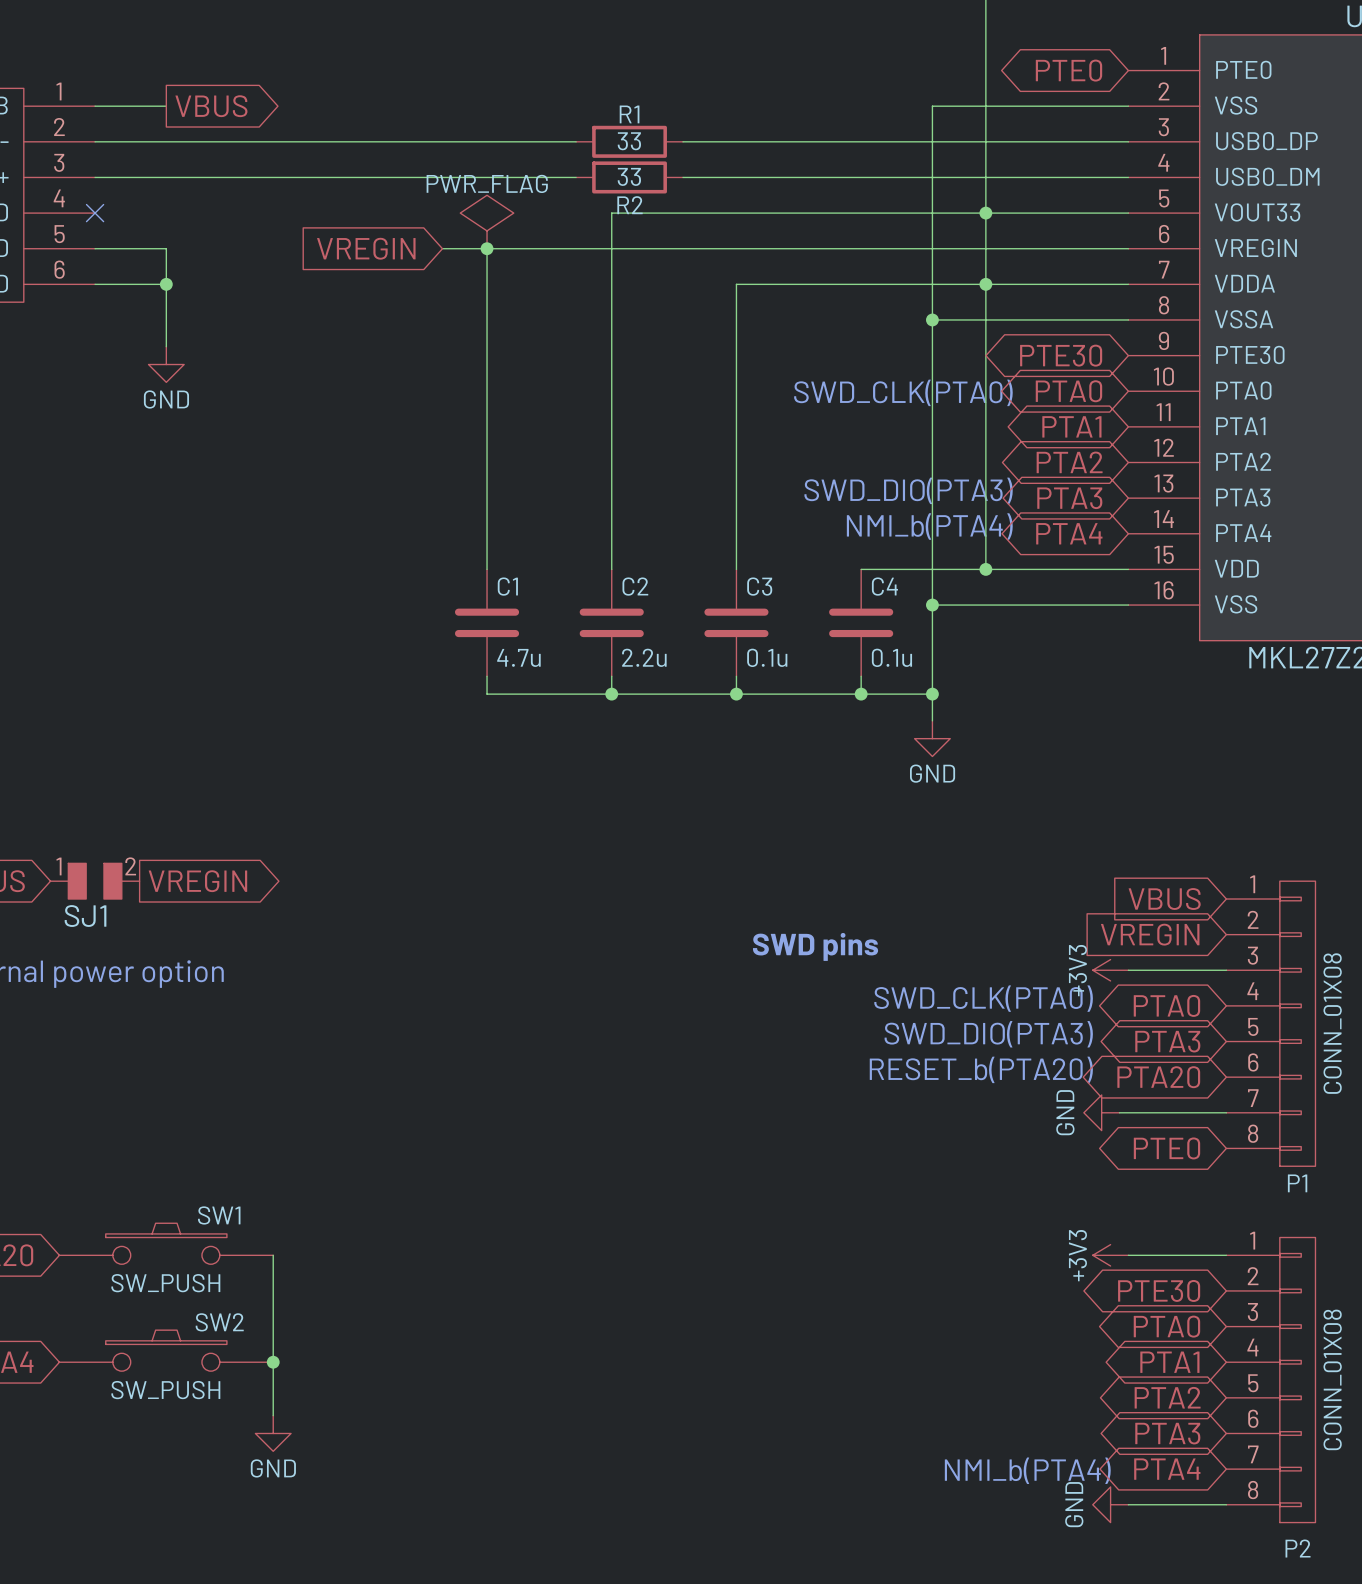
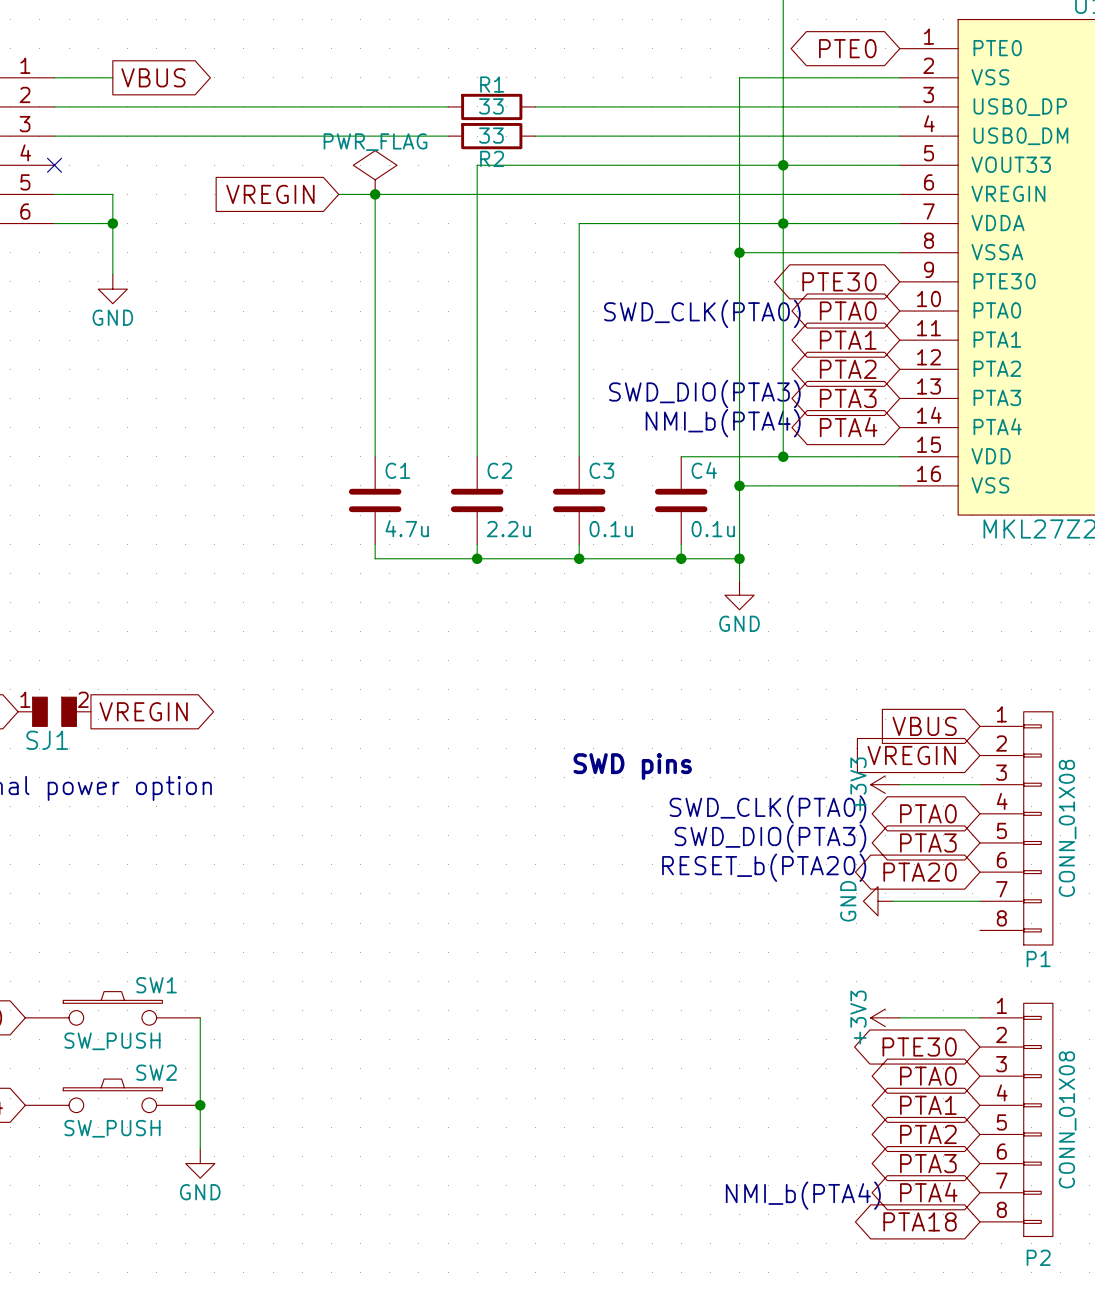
global label: PTE0 (1166, 1148) -> none
power symbol: GND (1110, 1504) -> none
wire: (1128, 1504) (1226, 1504) -> none
global label: none -> PTA18 (920, 1221)

